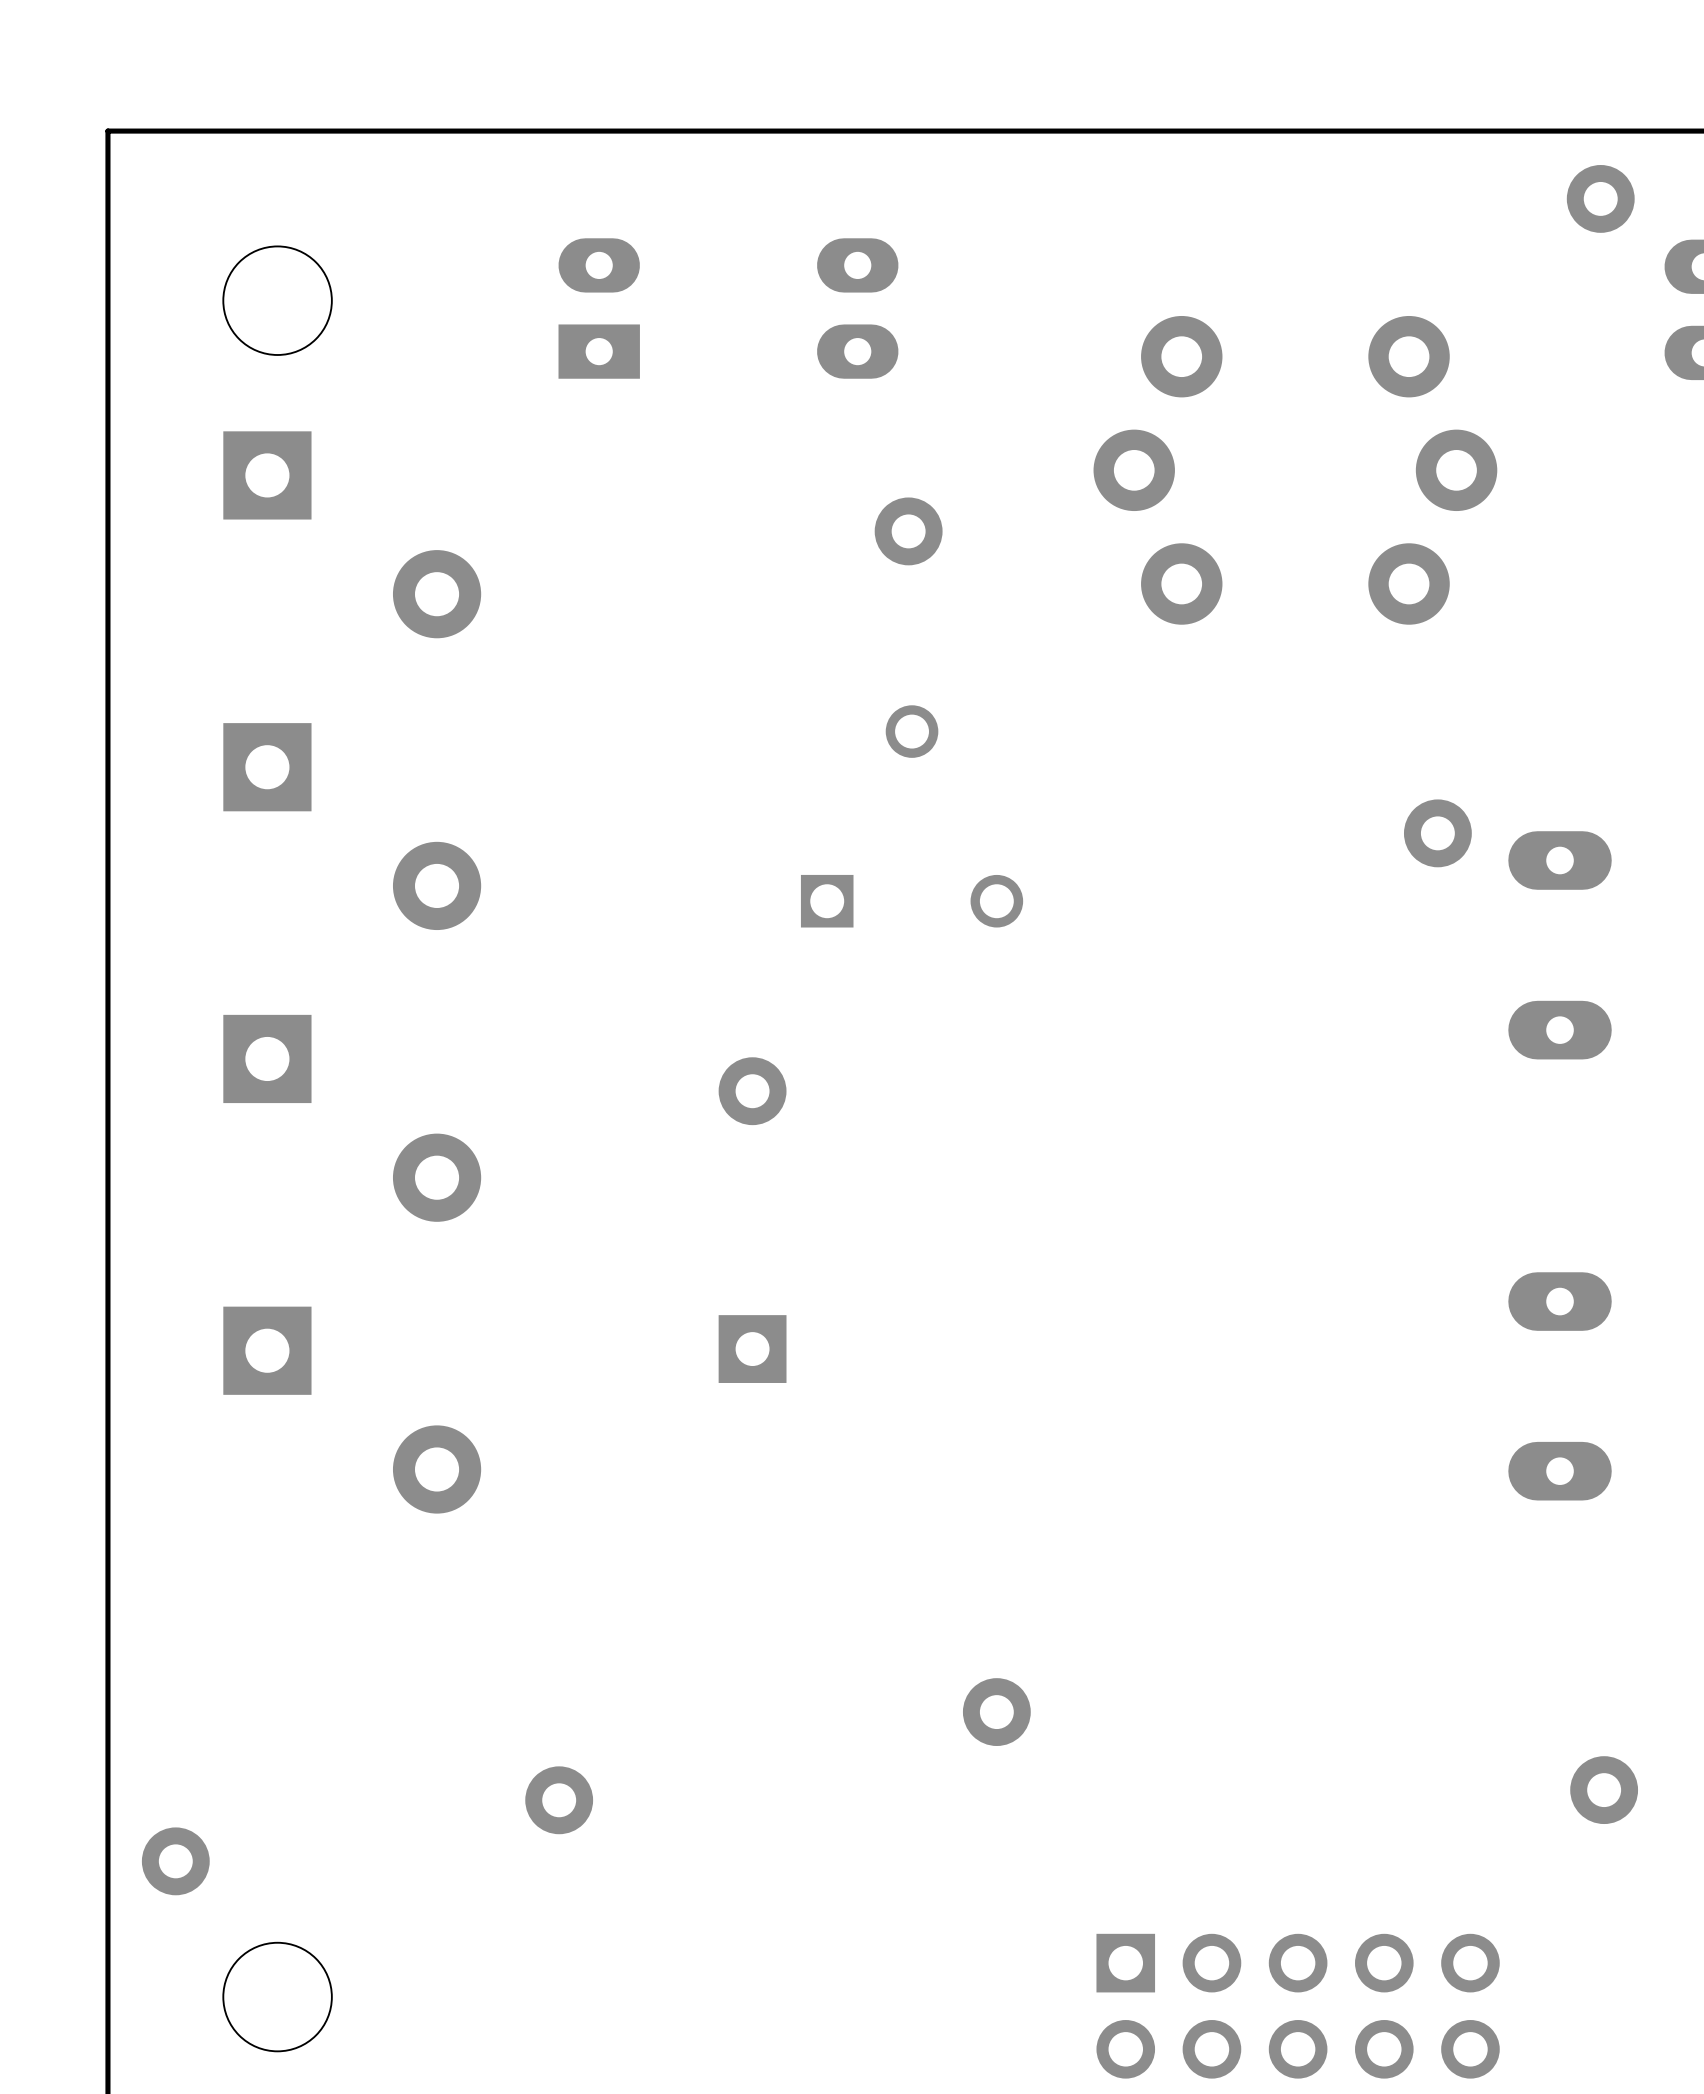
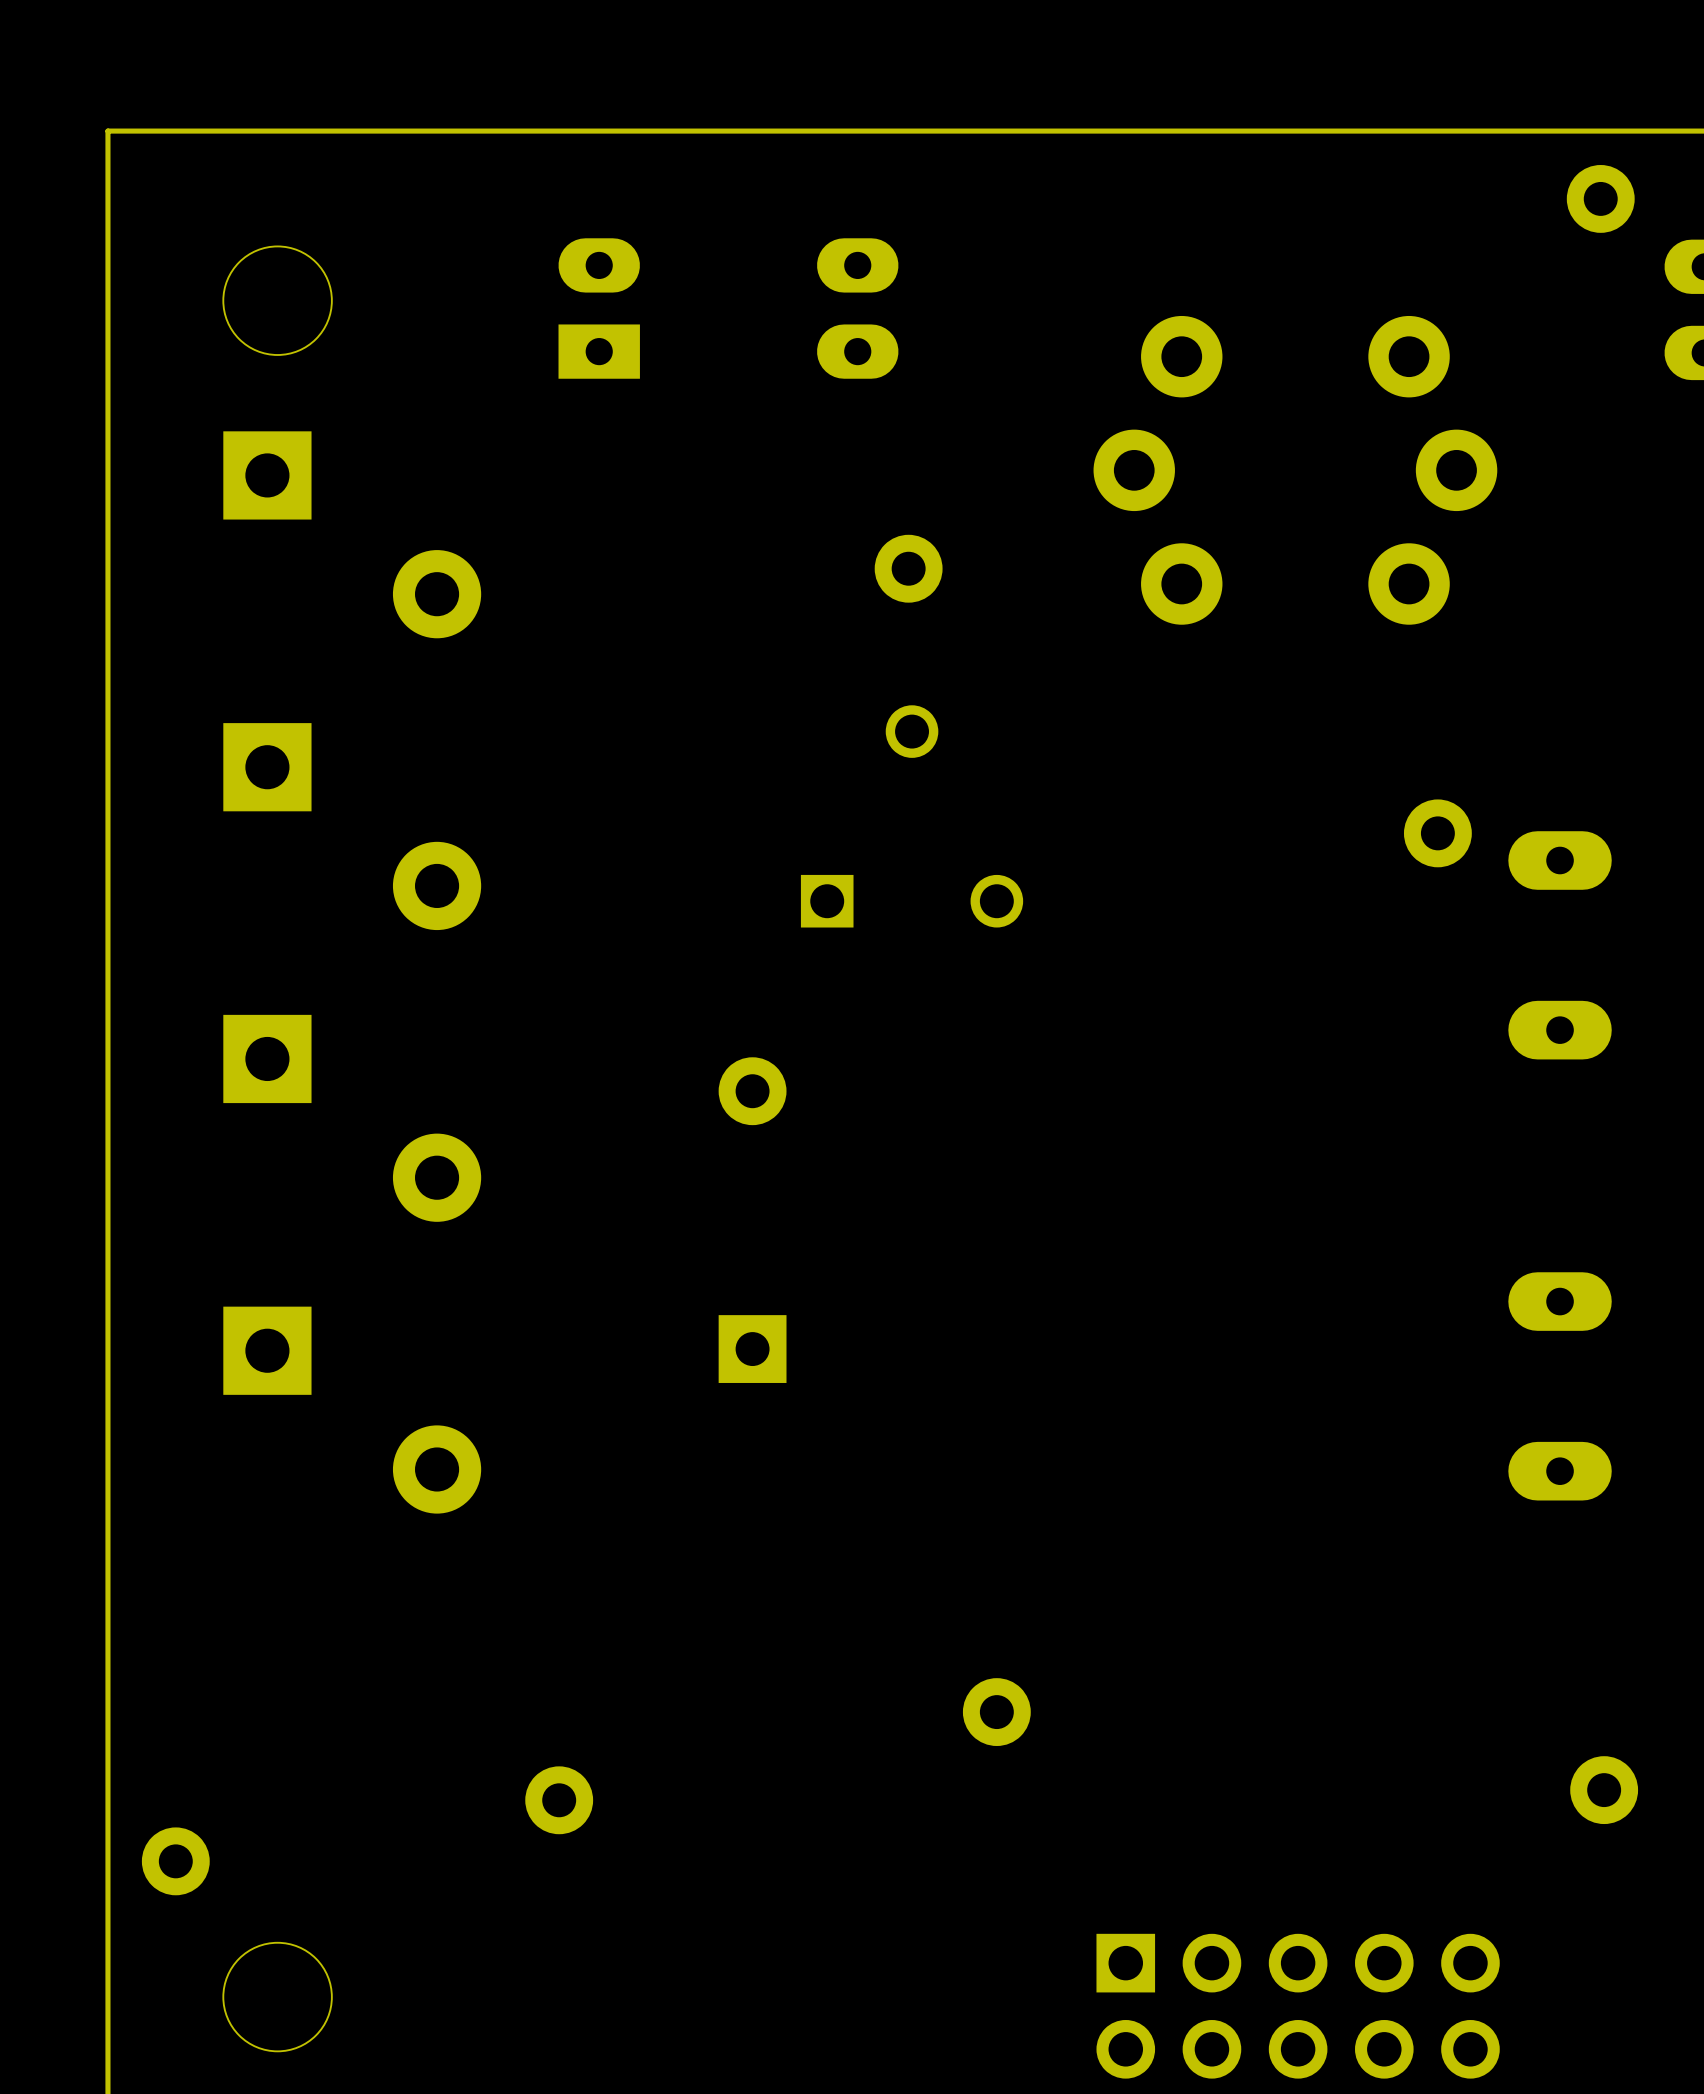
part position: (908, 531) -> (908, 568)

